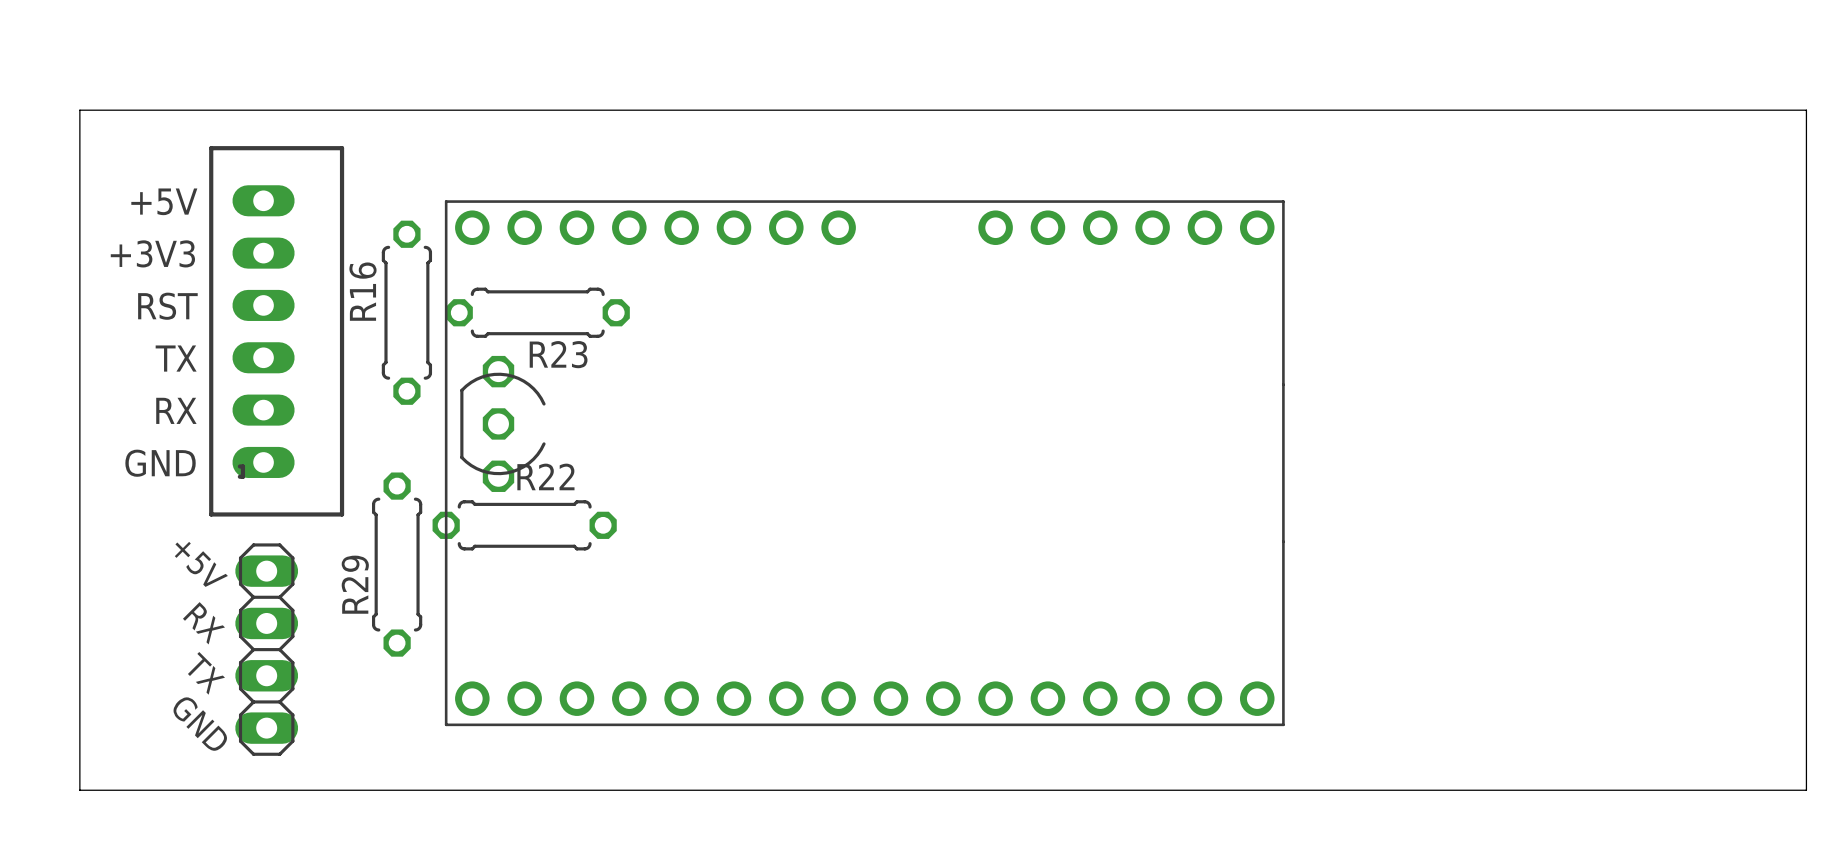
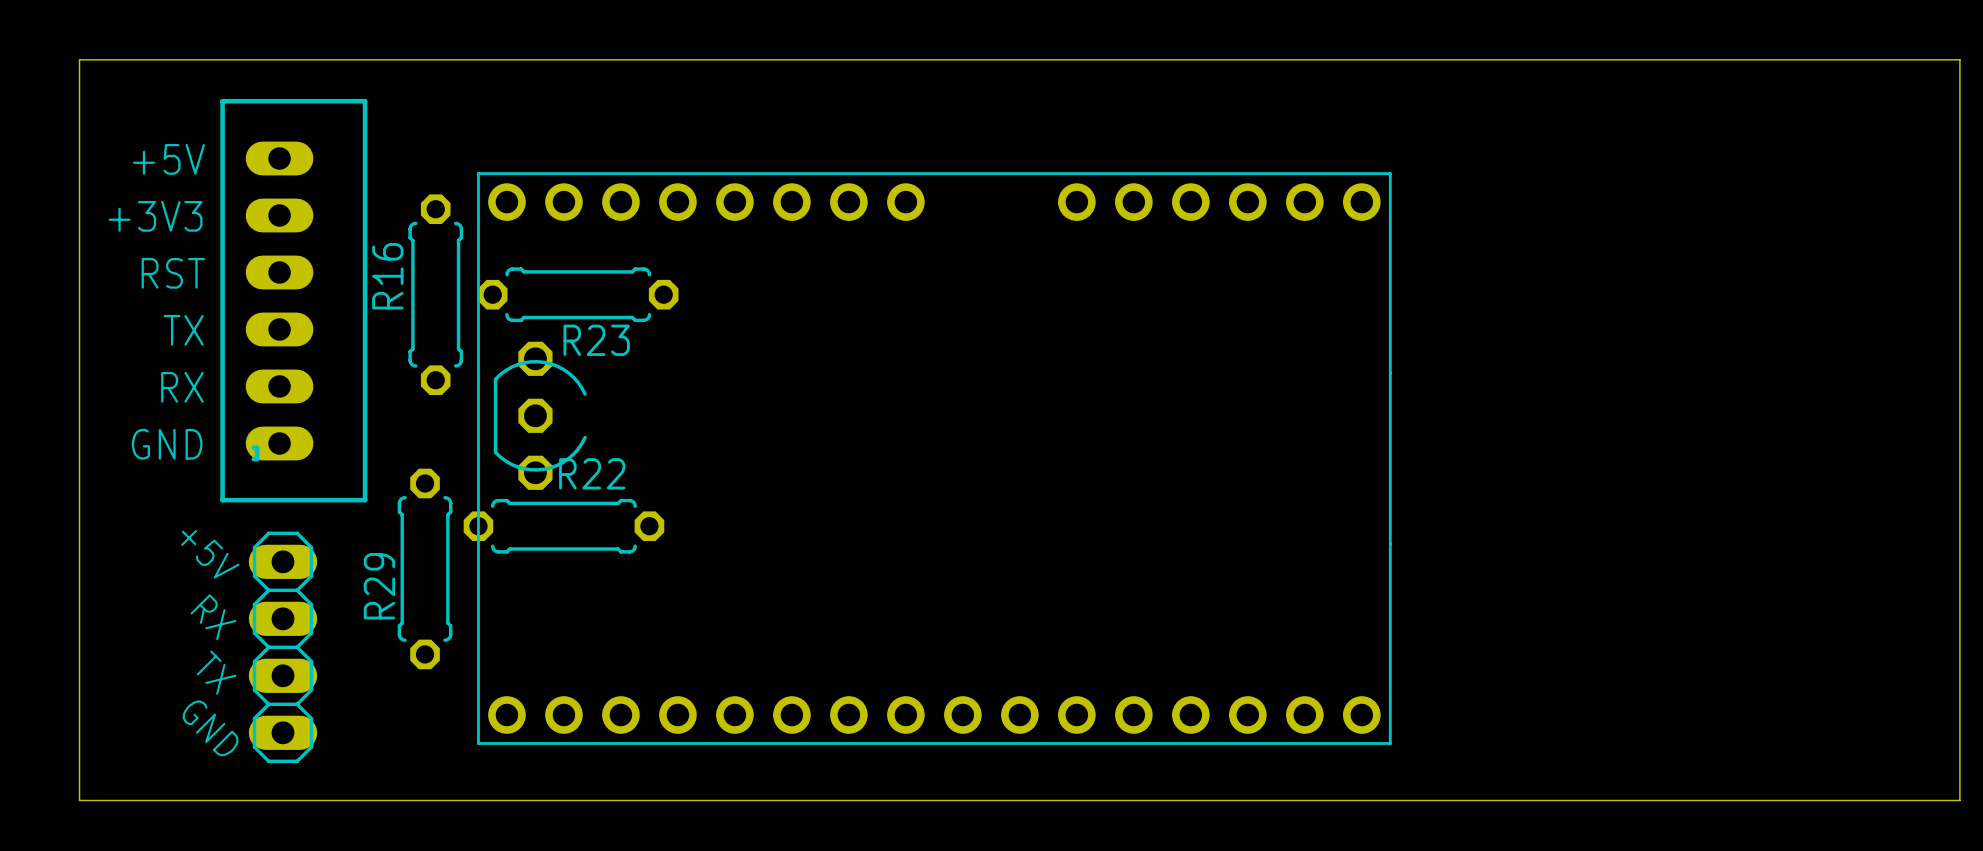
board edge: (79, 110) (1806, 110) -> (79, 74) (79, 59) (1959, 59) (1959, 74)
text position: +5V (164, 201) -> +5V (169, 159)
text position: +3V3 (152, 253) -> +3V3 (155, 216)
text position: RST (167, 306) -> RST (173, 273)
part position: (276, 331) -> (293, 300)
text position: TX (176, 358) -> TX (183, 330)
text position: RX (176, 410) -> RX (182, 387)
text position: GND (160, 463) -> GND (167, 444)
text position: +5V (201, 564) -> +5V (210, 554)
text position: RX (203, 623) -> RX (213, 617)
part position: (266, 649) -> (282, 647)
text position: TX (206, 673) -> TX (216, 672)
text position: GND (200, 723) -> GND (210, 728)
board edge: (79, 777) (79, 790) (1806, 790) (1806, 777) -> (79, 800) (1959, 800)

